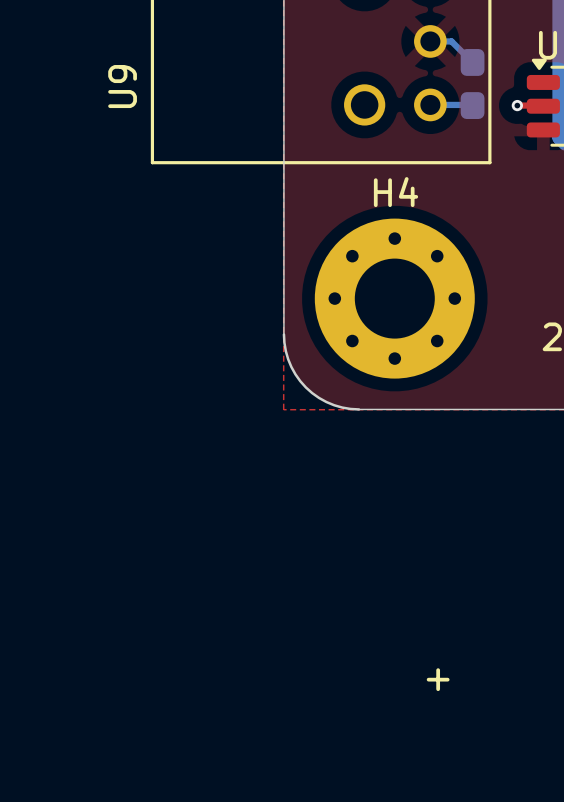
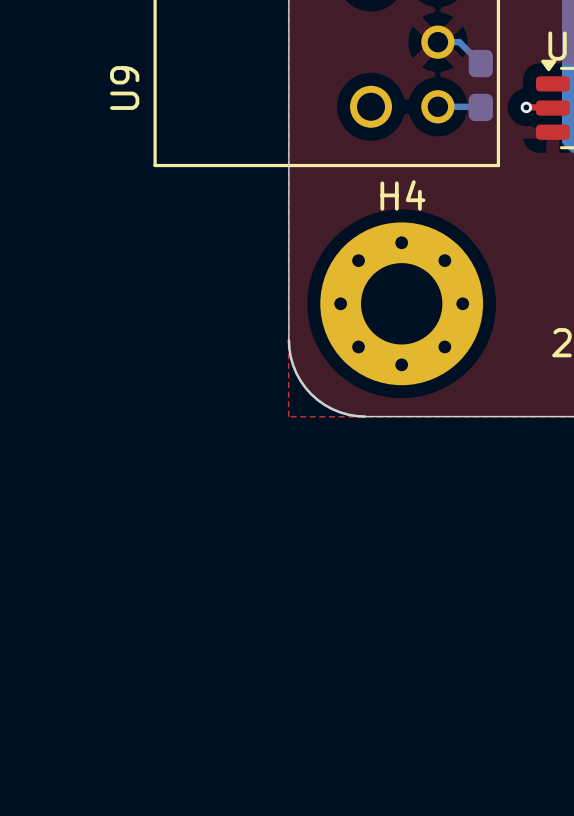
text: + (438, 679) -> none

